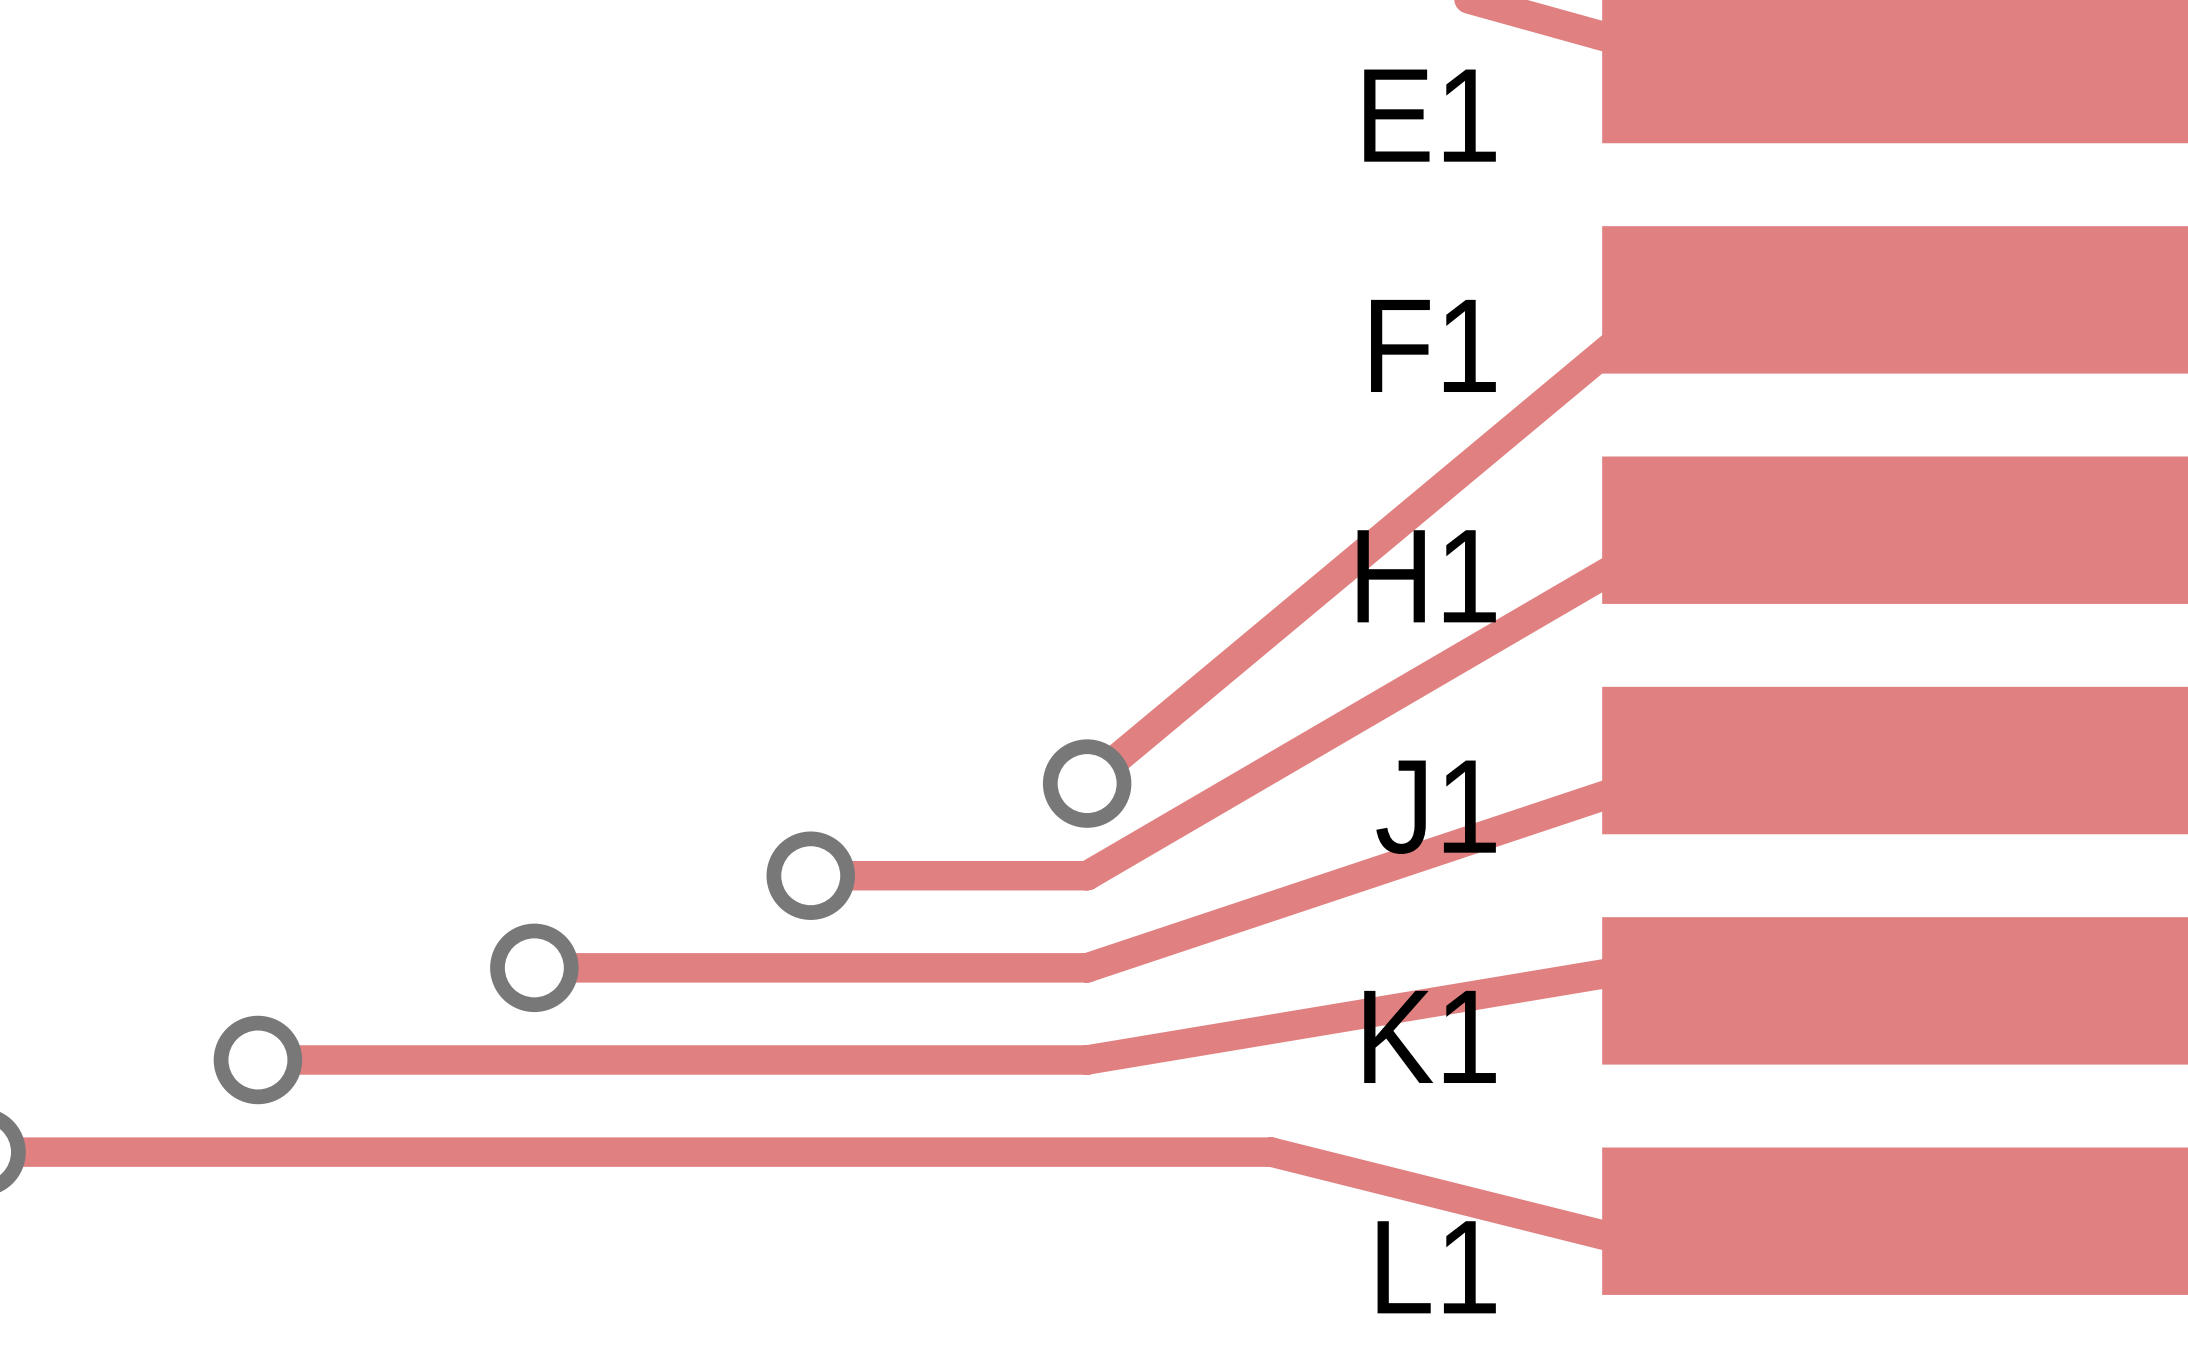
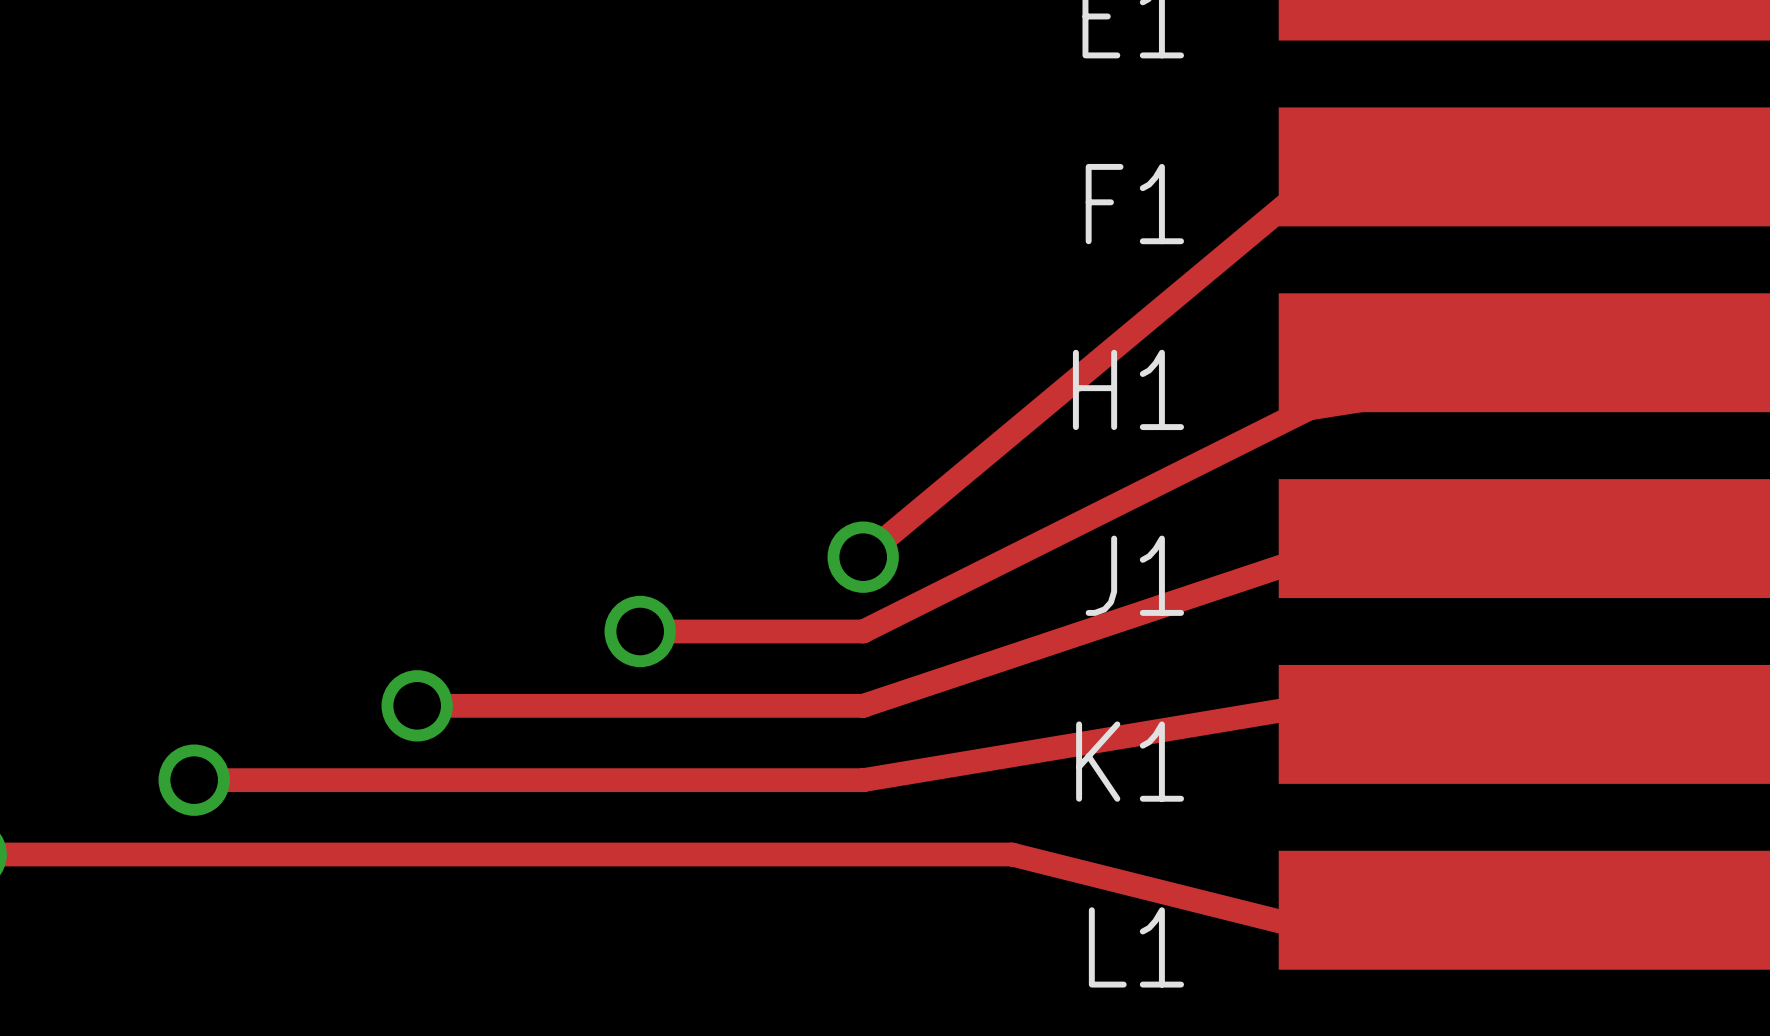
track: (2077, 530) (1639, 553) (1087, 875) -> (1662, 352) (1309, 408) (863, 631)

